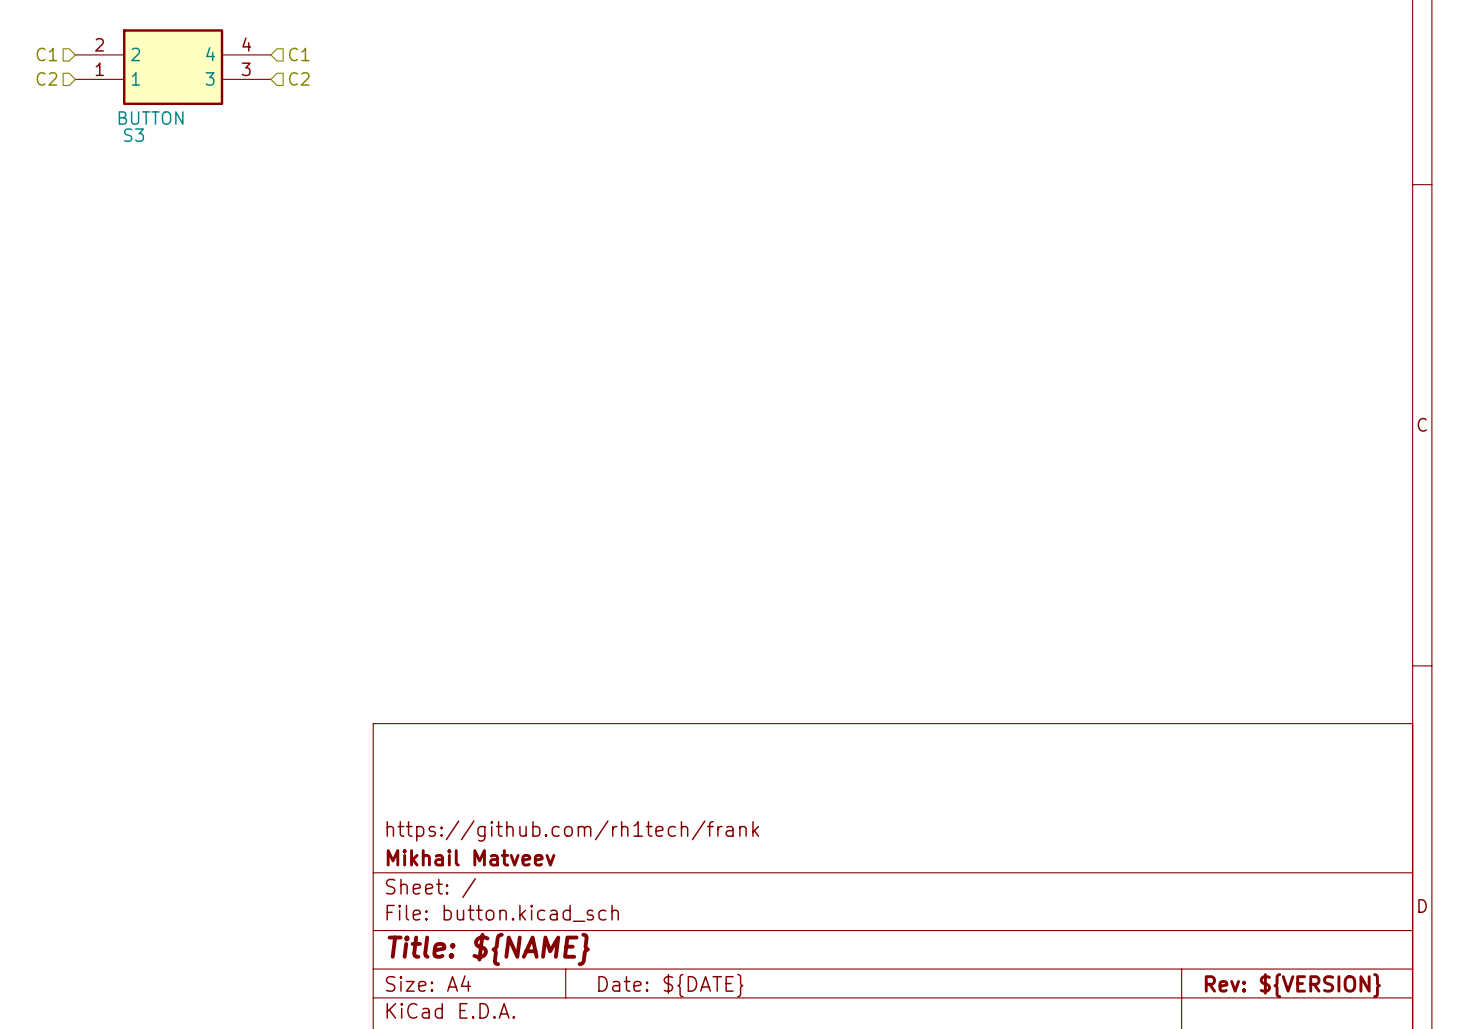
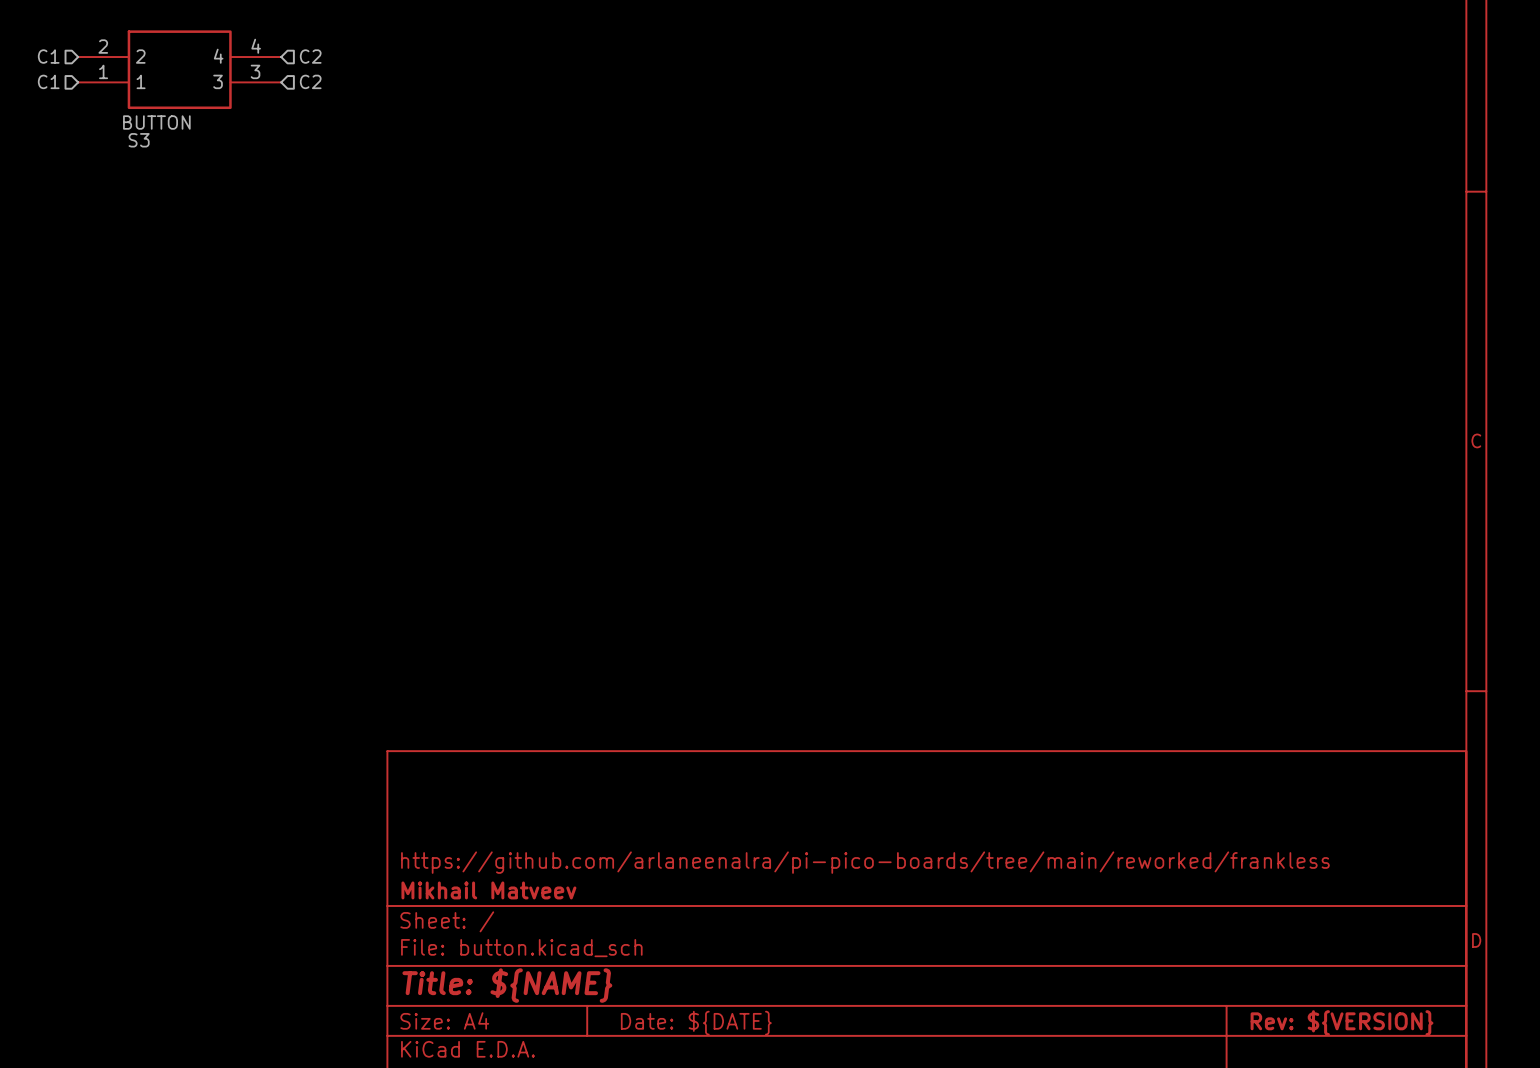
hierarchical label: C1 (299, 54) -> C2 (310, 56)
hierarchical label: C2 (46, 78) -> C1 (48, 81)
title block: https://github.com/rh1tech/frank (572, 831) -> https://github.com/arlaneenalra/pi-pico-boards/tree/main/reworked/frankless (865, 862)

